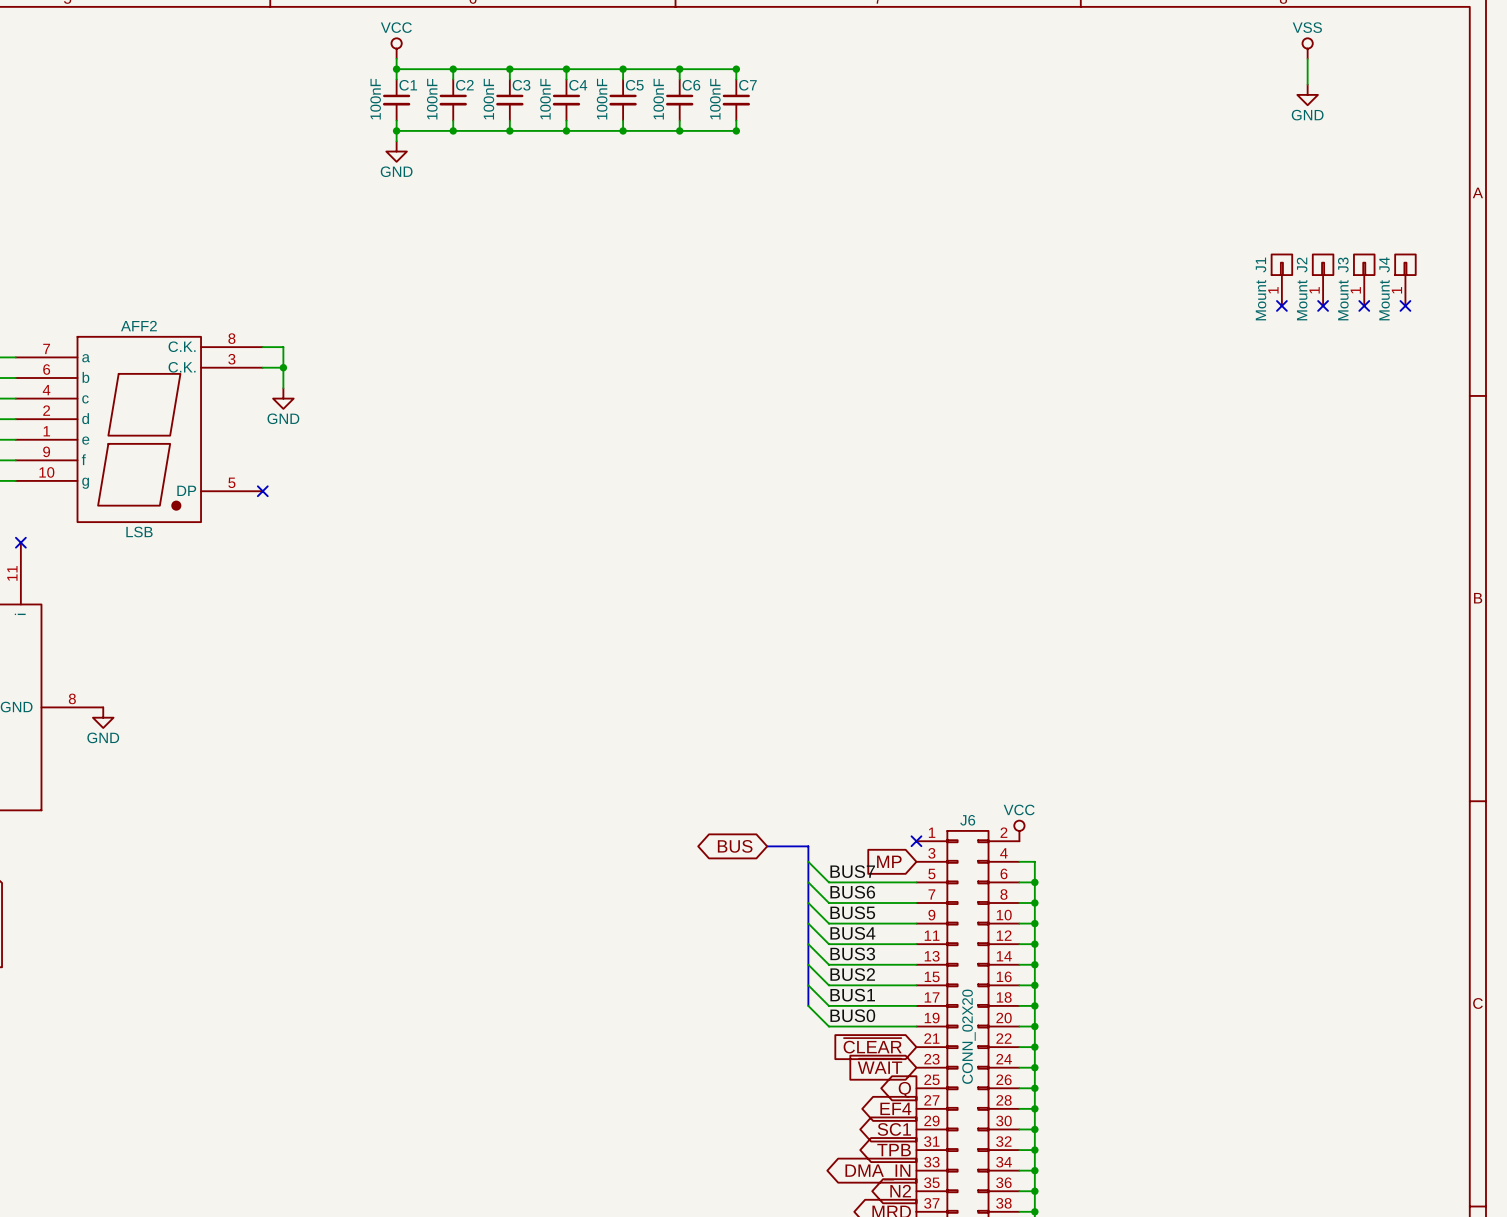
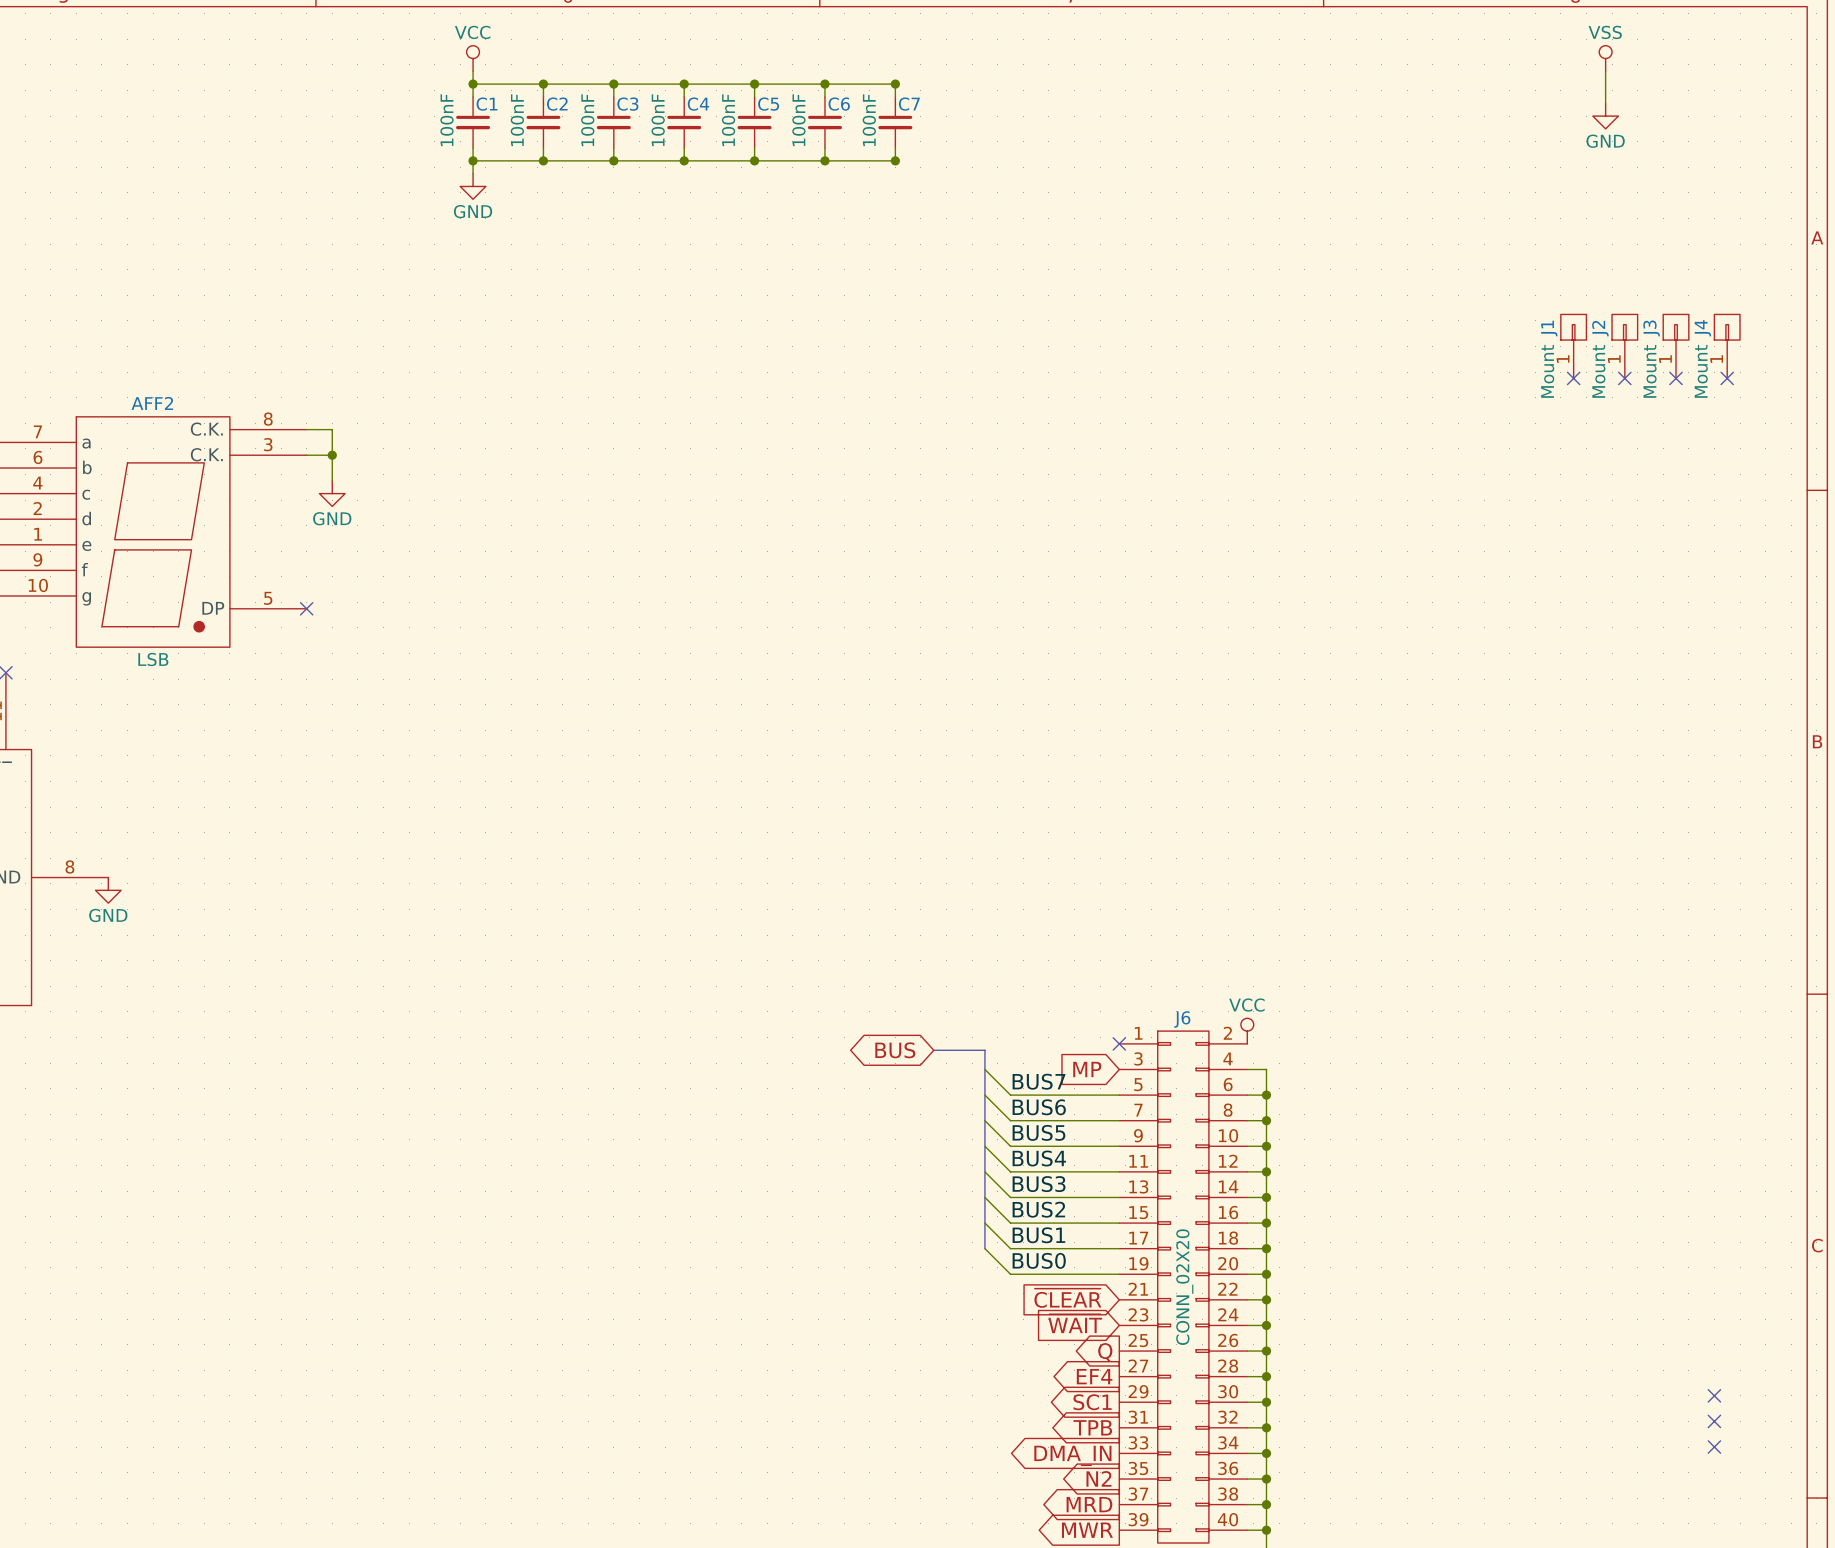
no-connect mark: none -> (1714, 1395)
no-connect mark: none -> (1714, 1421)
no-connect mark: none -> (1714, 1447)

